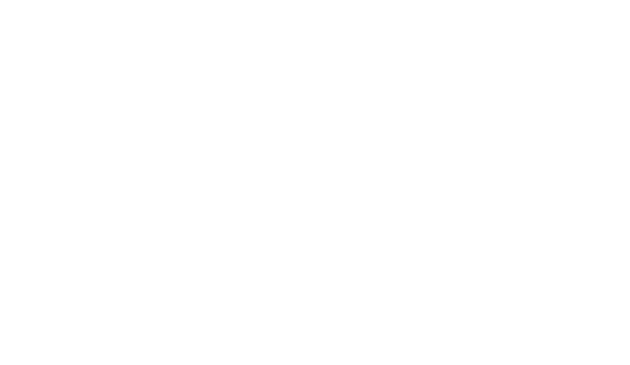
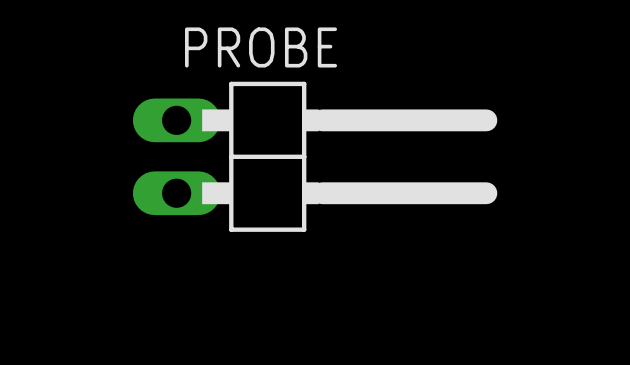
PROBE: none -> (315, 156)

